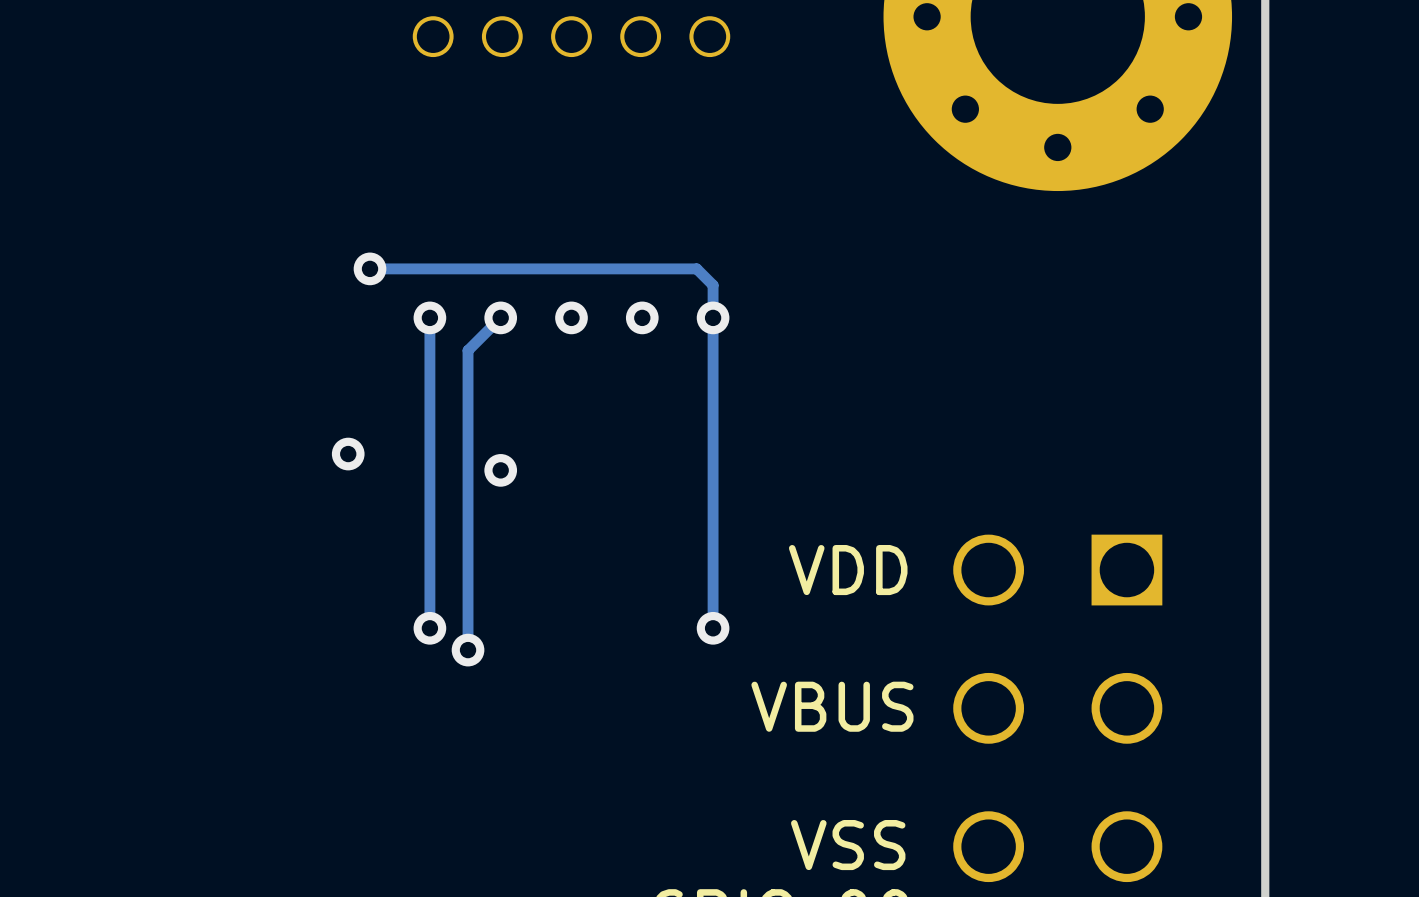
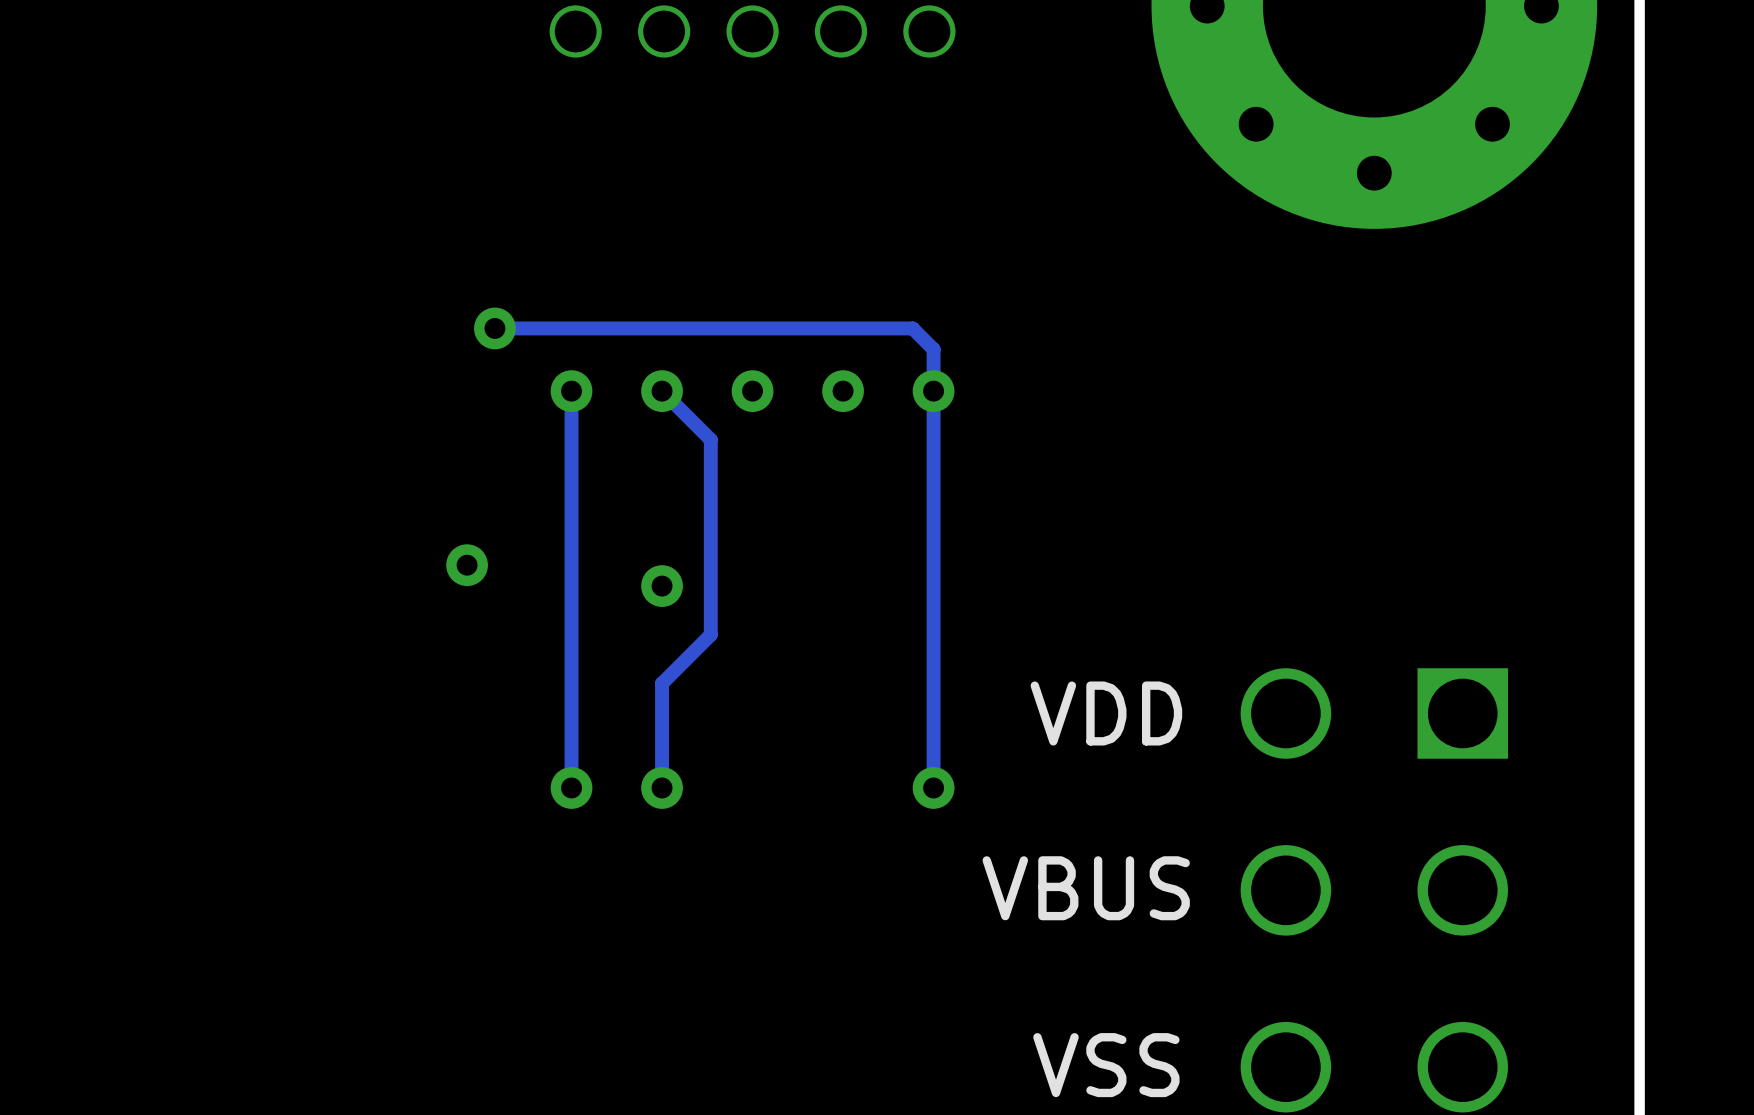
track: (500, 317) (468, 350) (468, 650) -> (662, 391) (710, 439) (710, 634) (662, 683) (662, 787)
via position: (468, 650) -> (662, 787)

